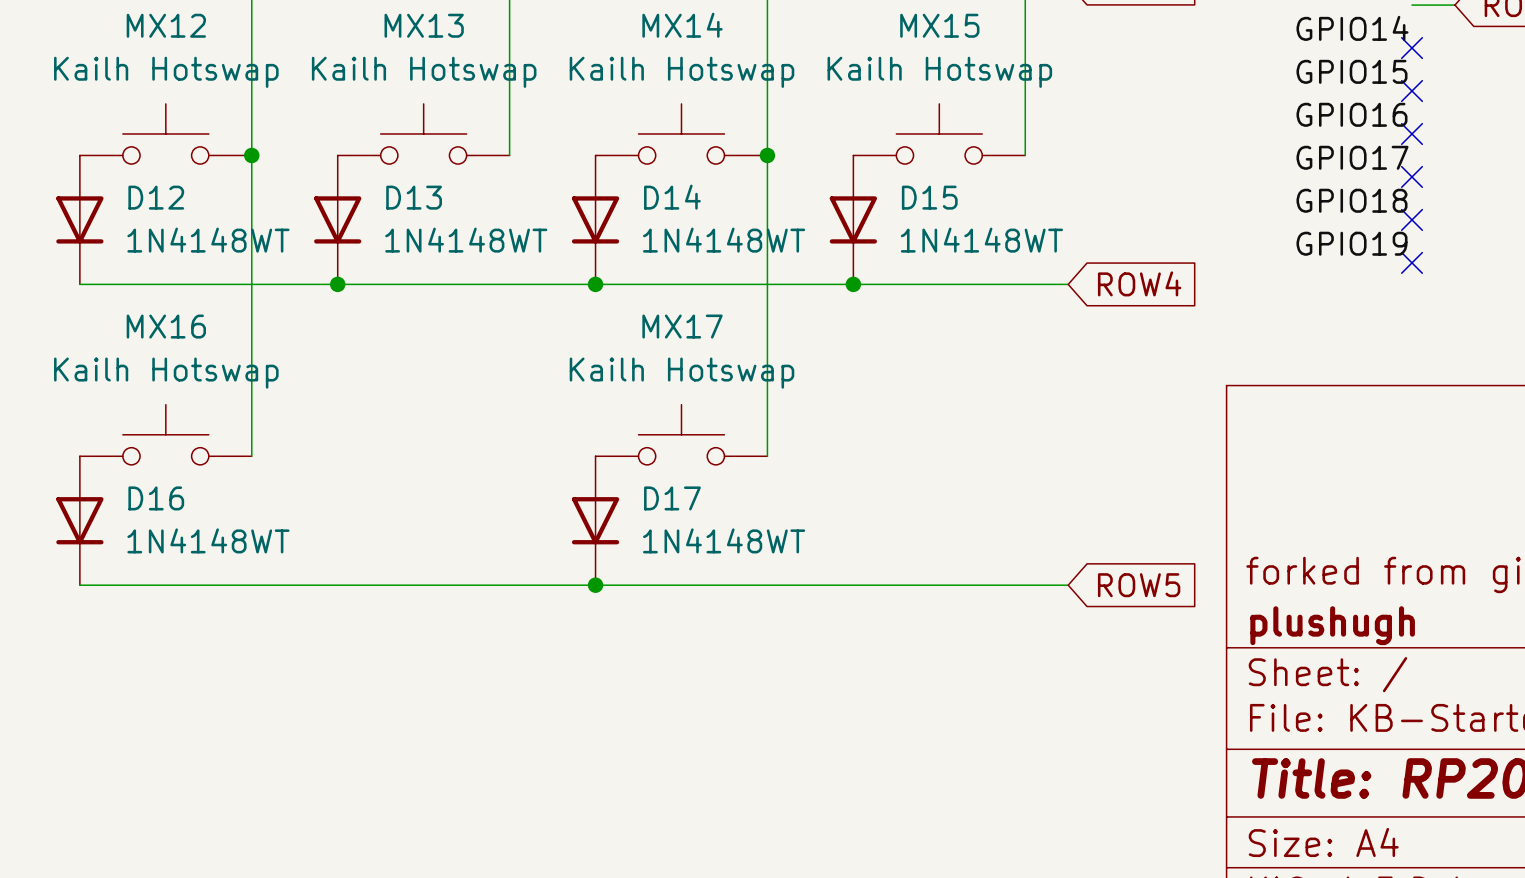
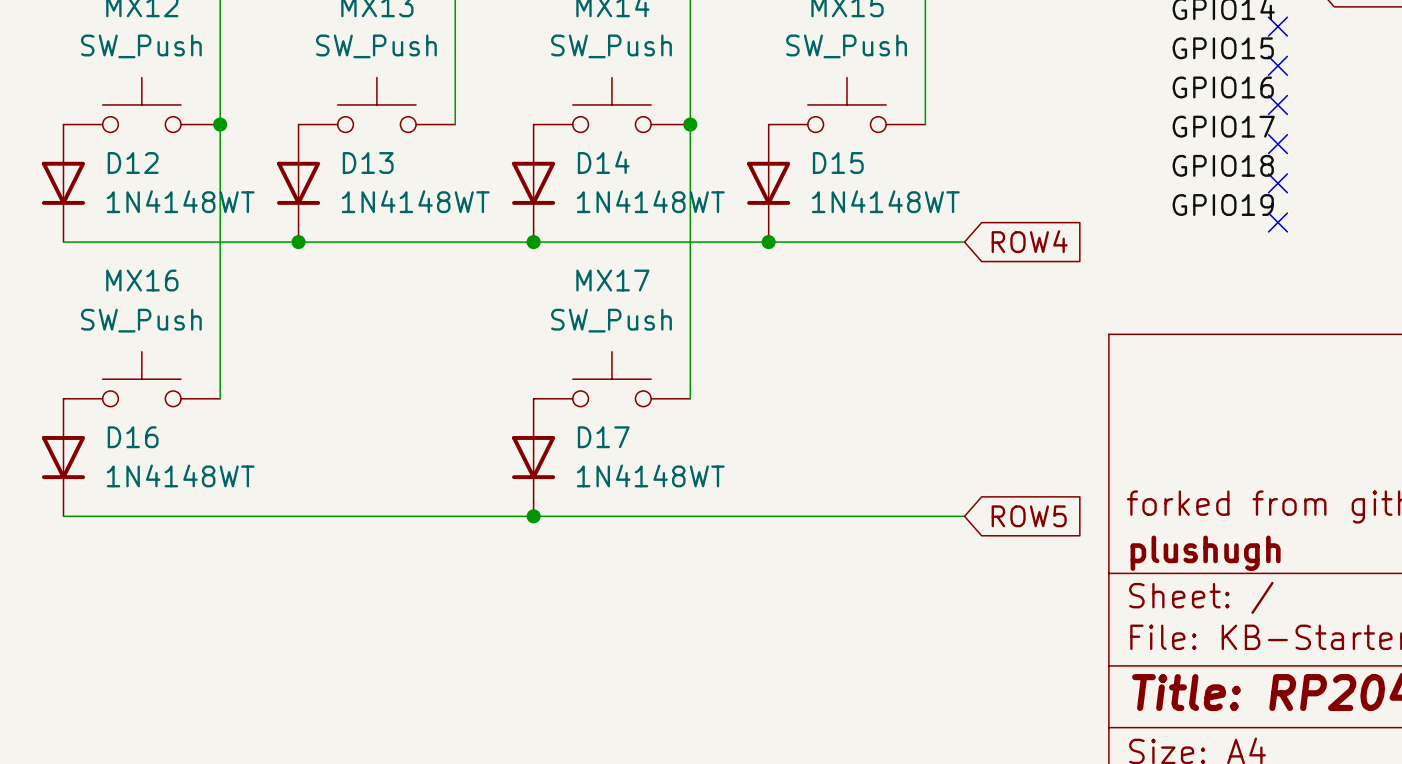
MX12 value: Kailh Hotswap (166, 72) -> SW_Push (141, 46)
MX13 value: Kailh Hotswap (424, 72) -> SW_Push (376, 46)
MX14 value: Kailh Hotswap (681, 72) -> SW_Push (611, 46)
MX15 value: Kailh Hotswap (939, 72) -> SW_Push (846, 46)
MX16 value: Kailh Hotswap (166, 373) -> SW_Push (141, 320)
MX17 value: Kailh Hotswap (681, 373) -> SW_Push (611, 320)

